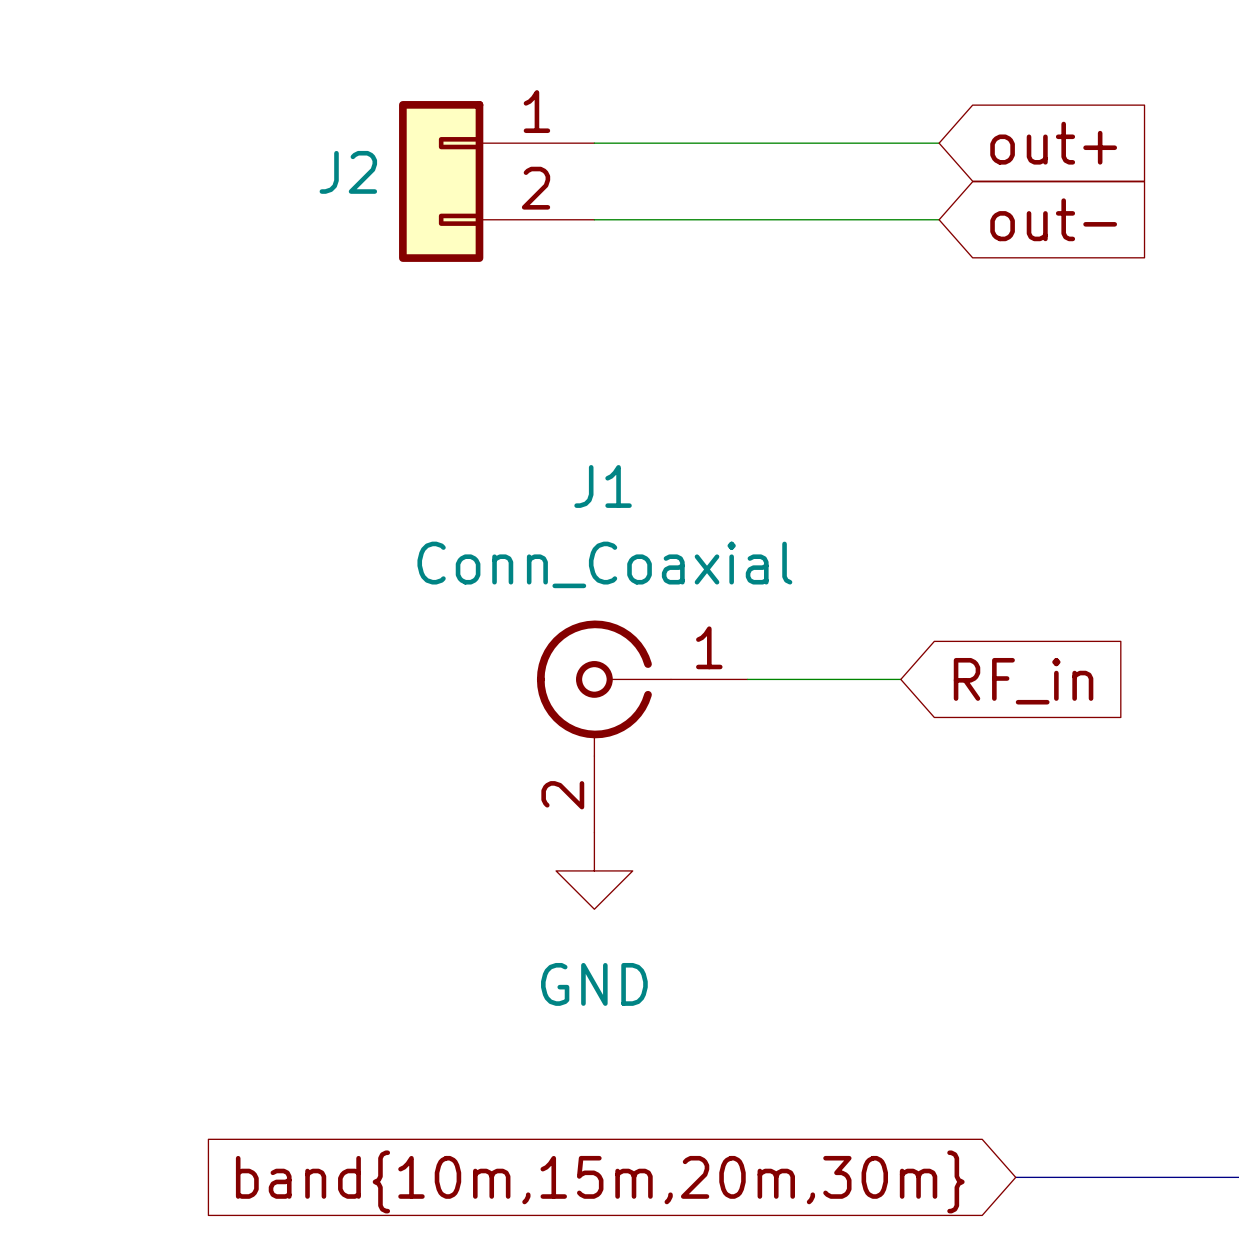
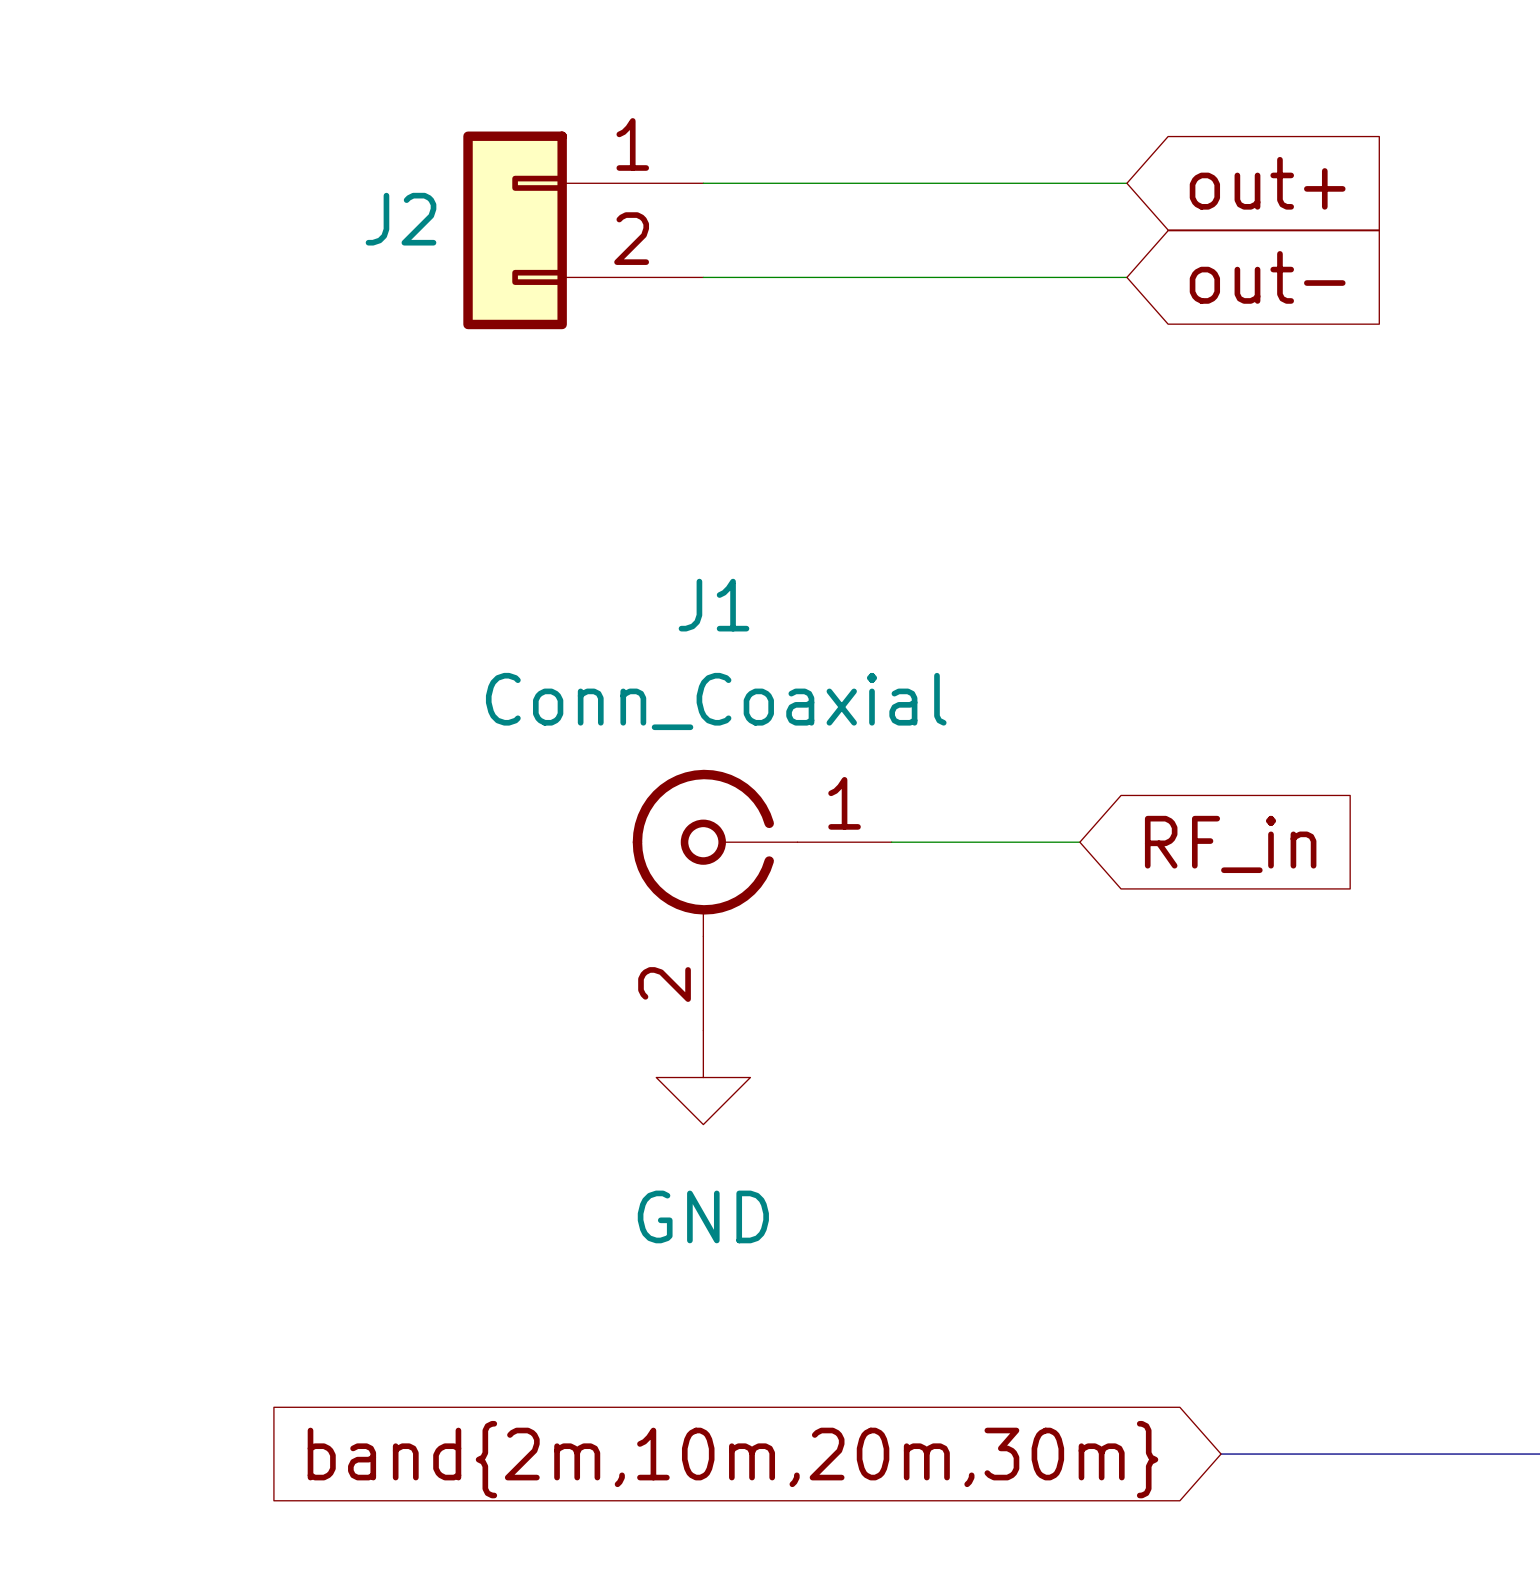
global label: band{10m,15m,20m,30m} (600, 1181) -> band{2m,10m,20m,30m} (732, 1459)

